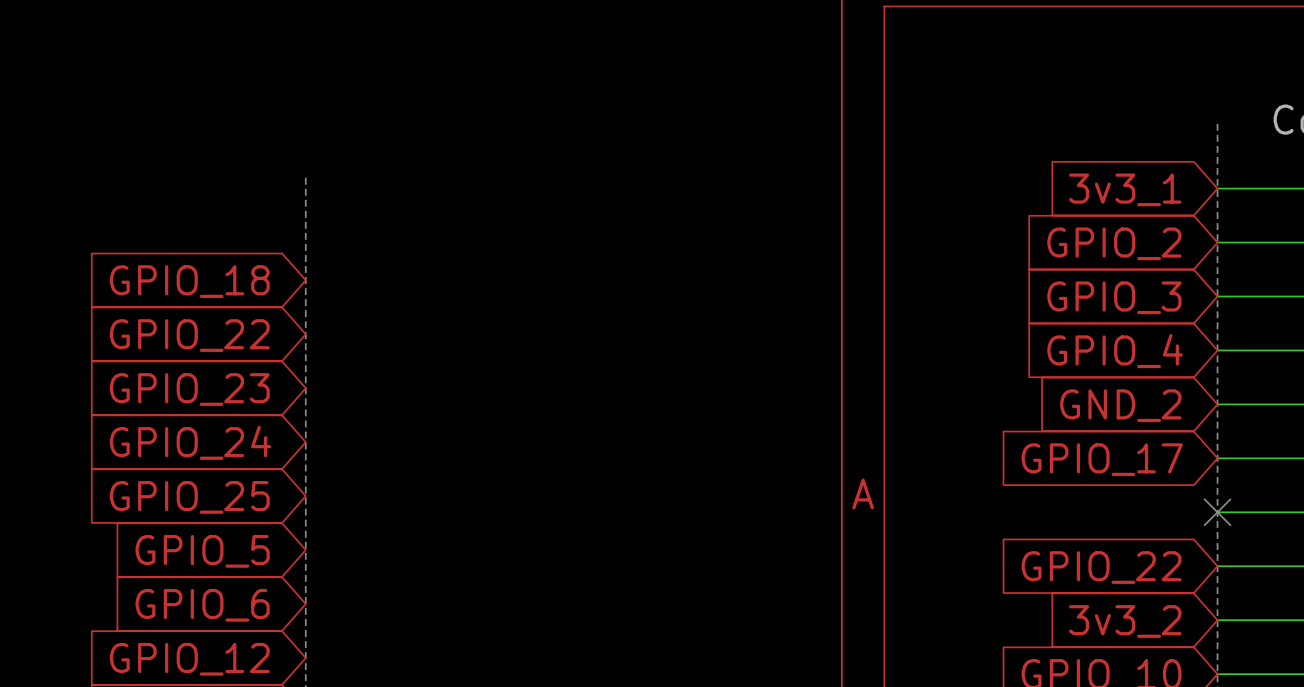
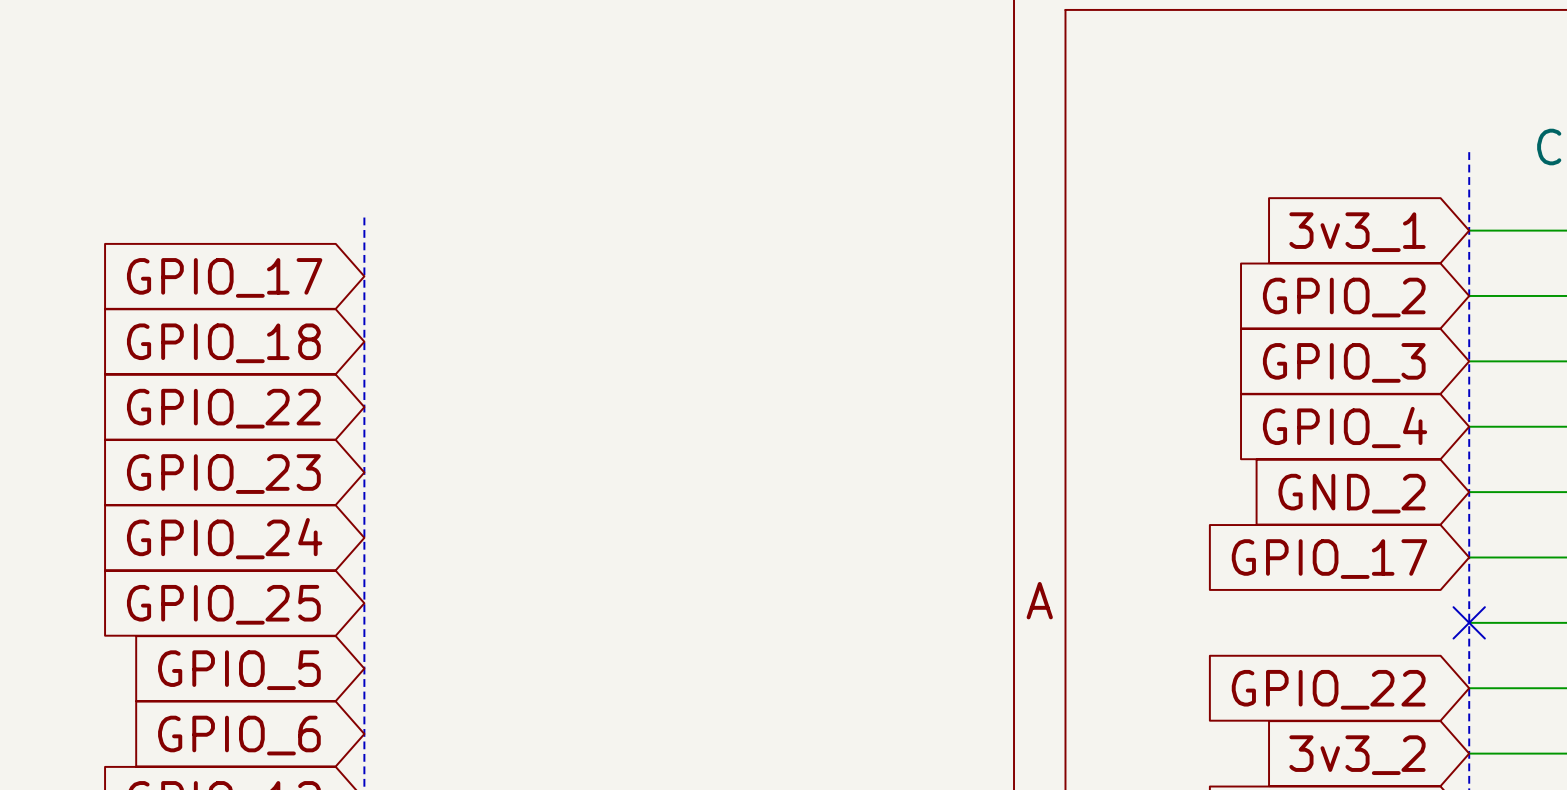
global label: none -> GPIO_17 (224, 277)

